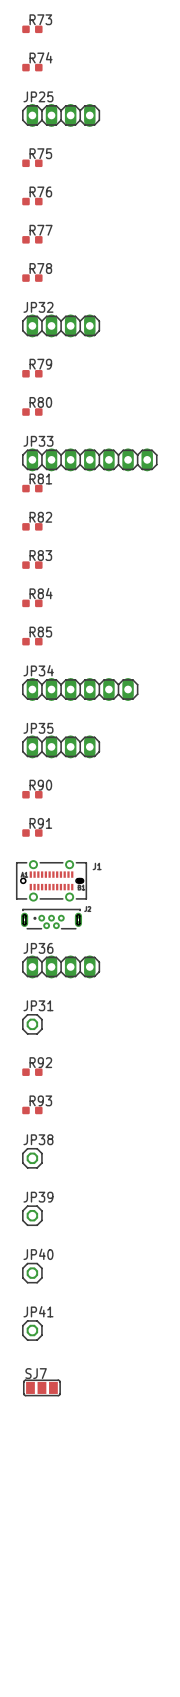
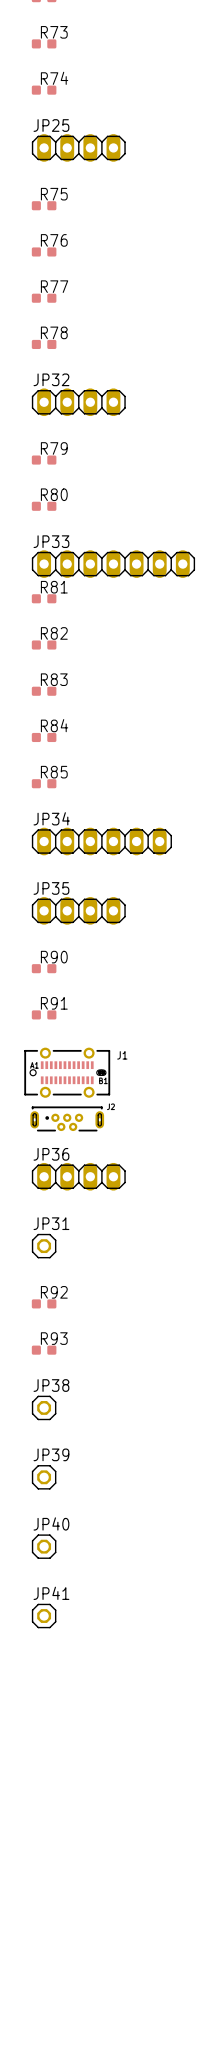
SJ7: (41, 1387) -> none

